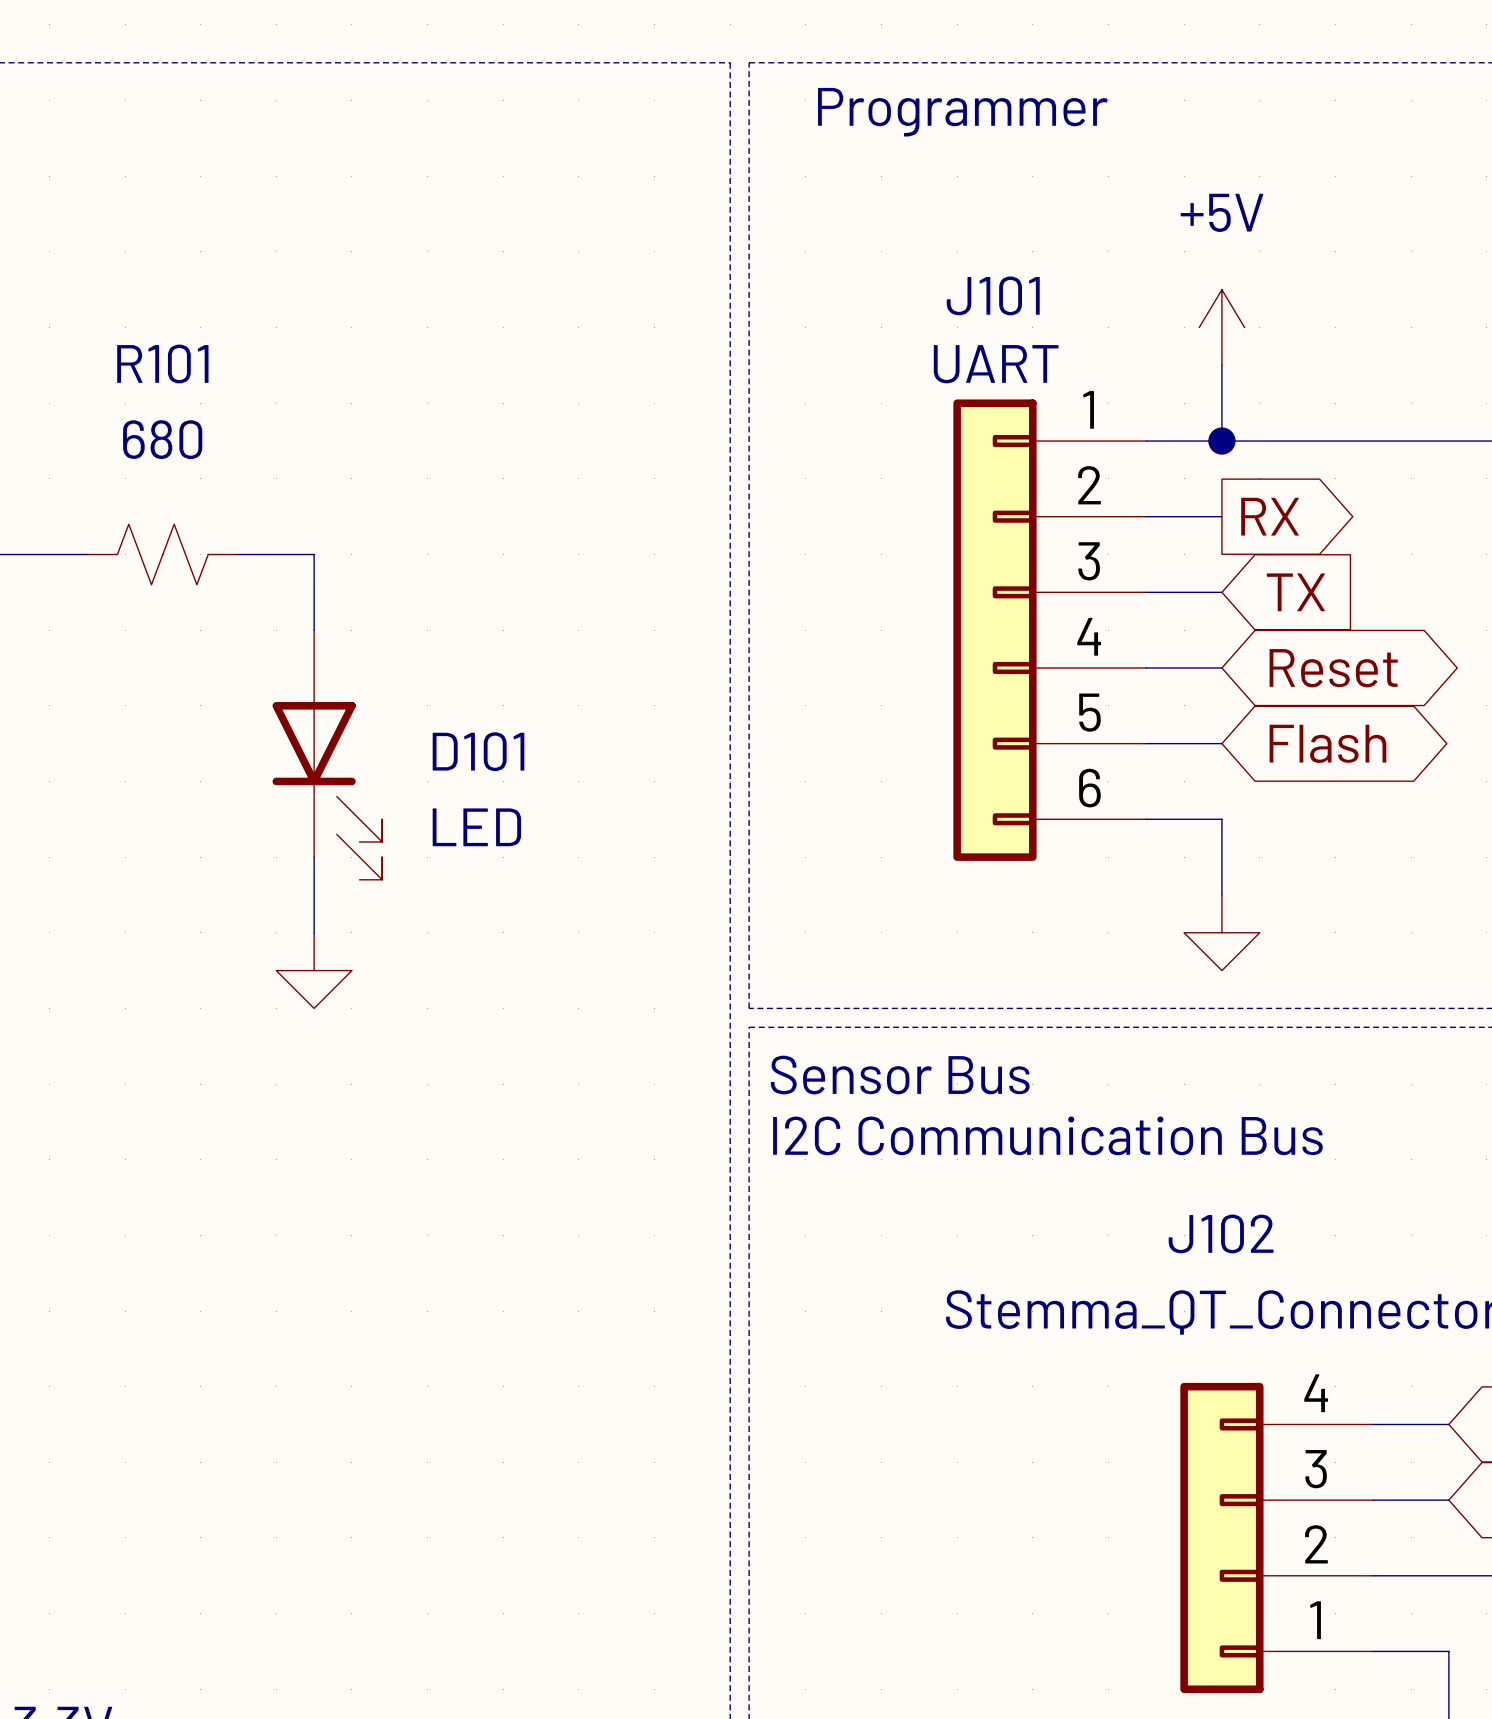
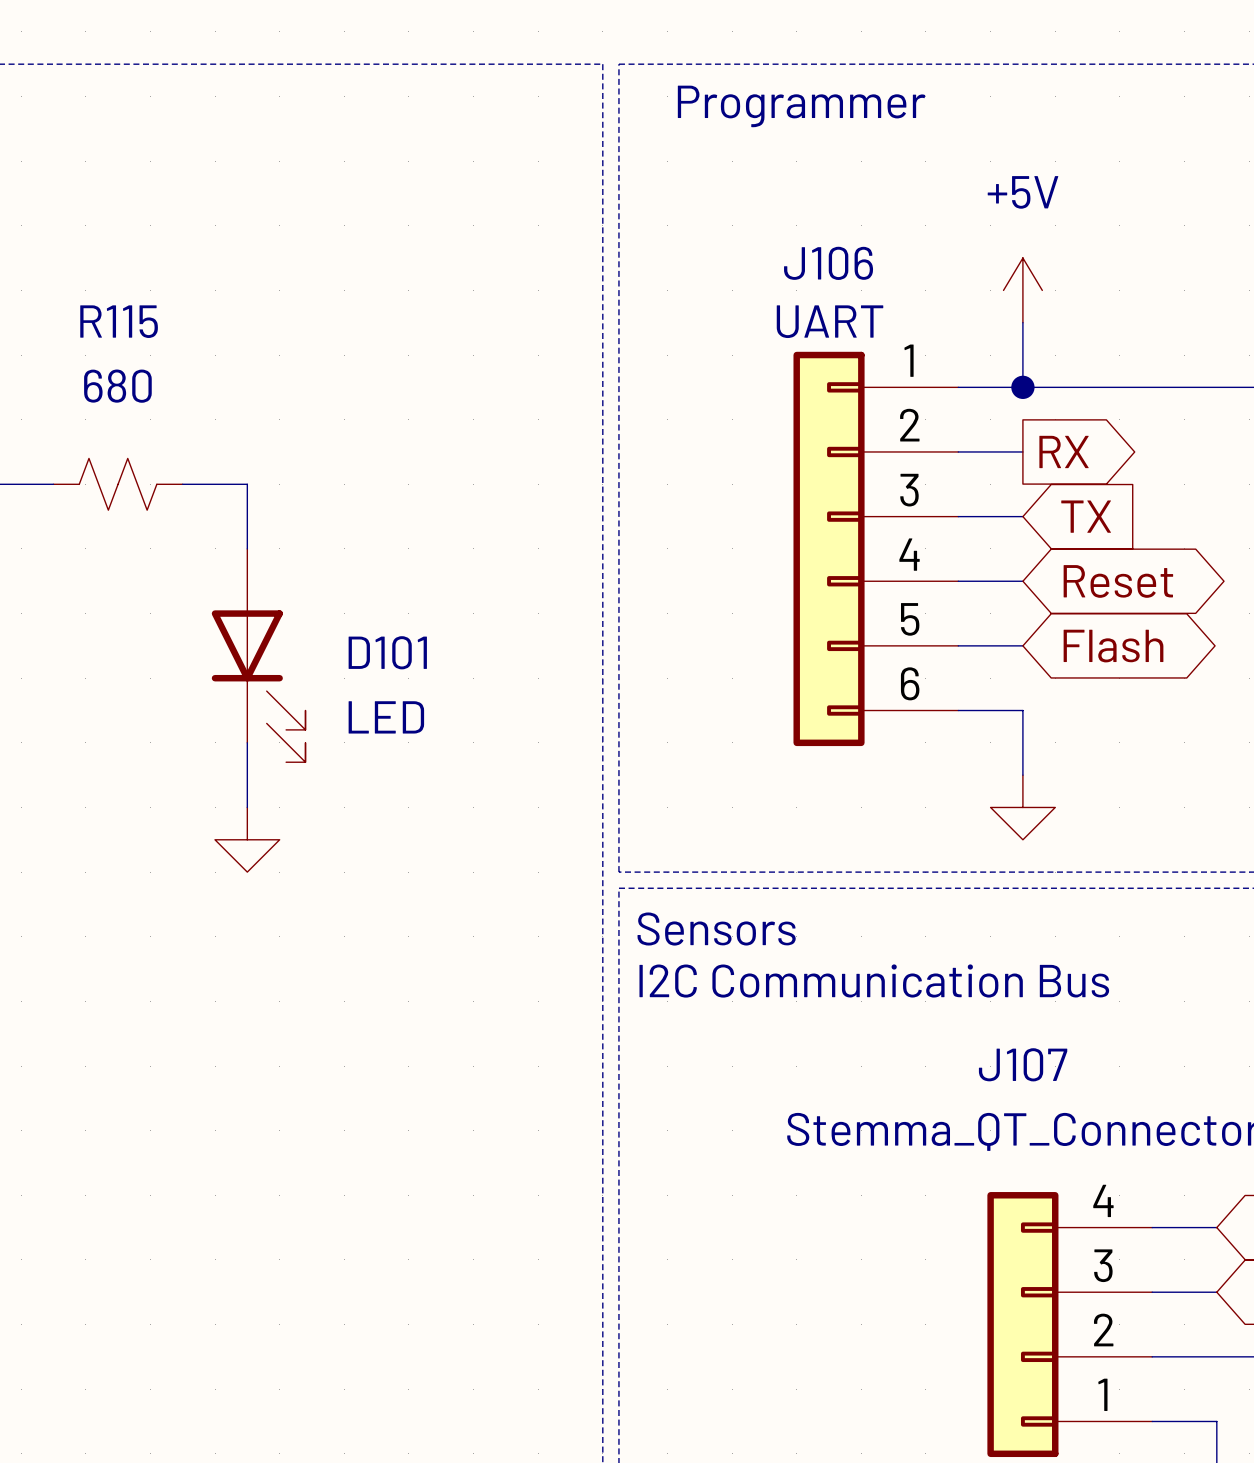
J101 name: J101 (993, 295) -> J106 (828, 263)
R101 name: R101 (162, 363) -> R115 (119, 321)
text: Sensor Bus (900, 1075) -> Sensors (716, 929)
J102 name: J102 (1221, 1233) -> J107 (1023, 1064)

